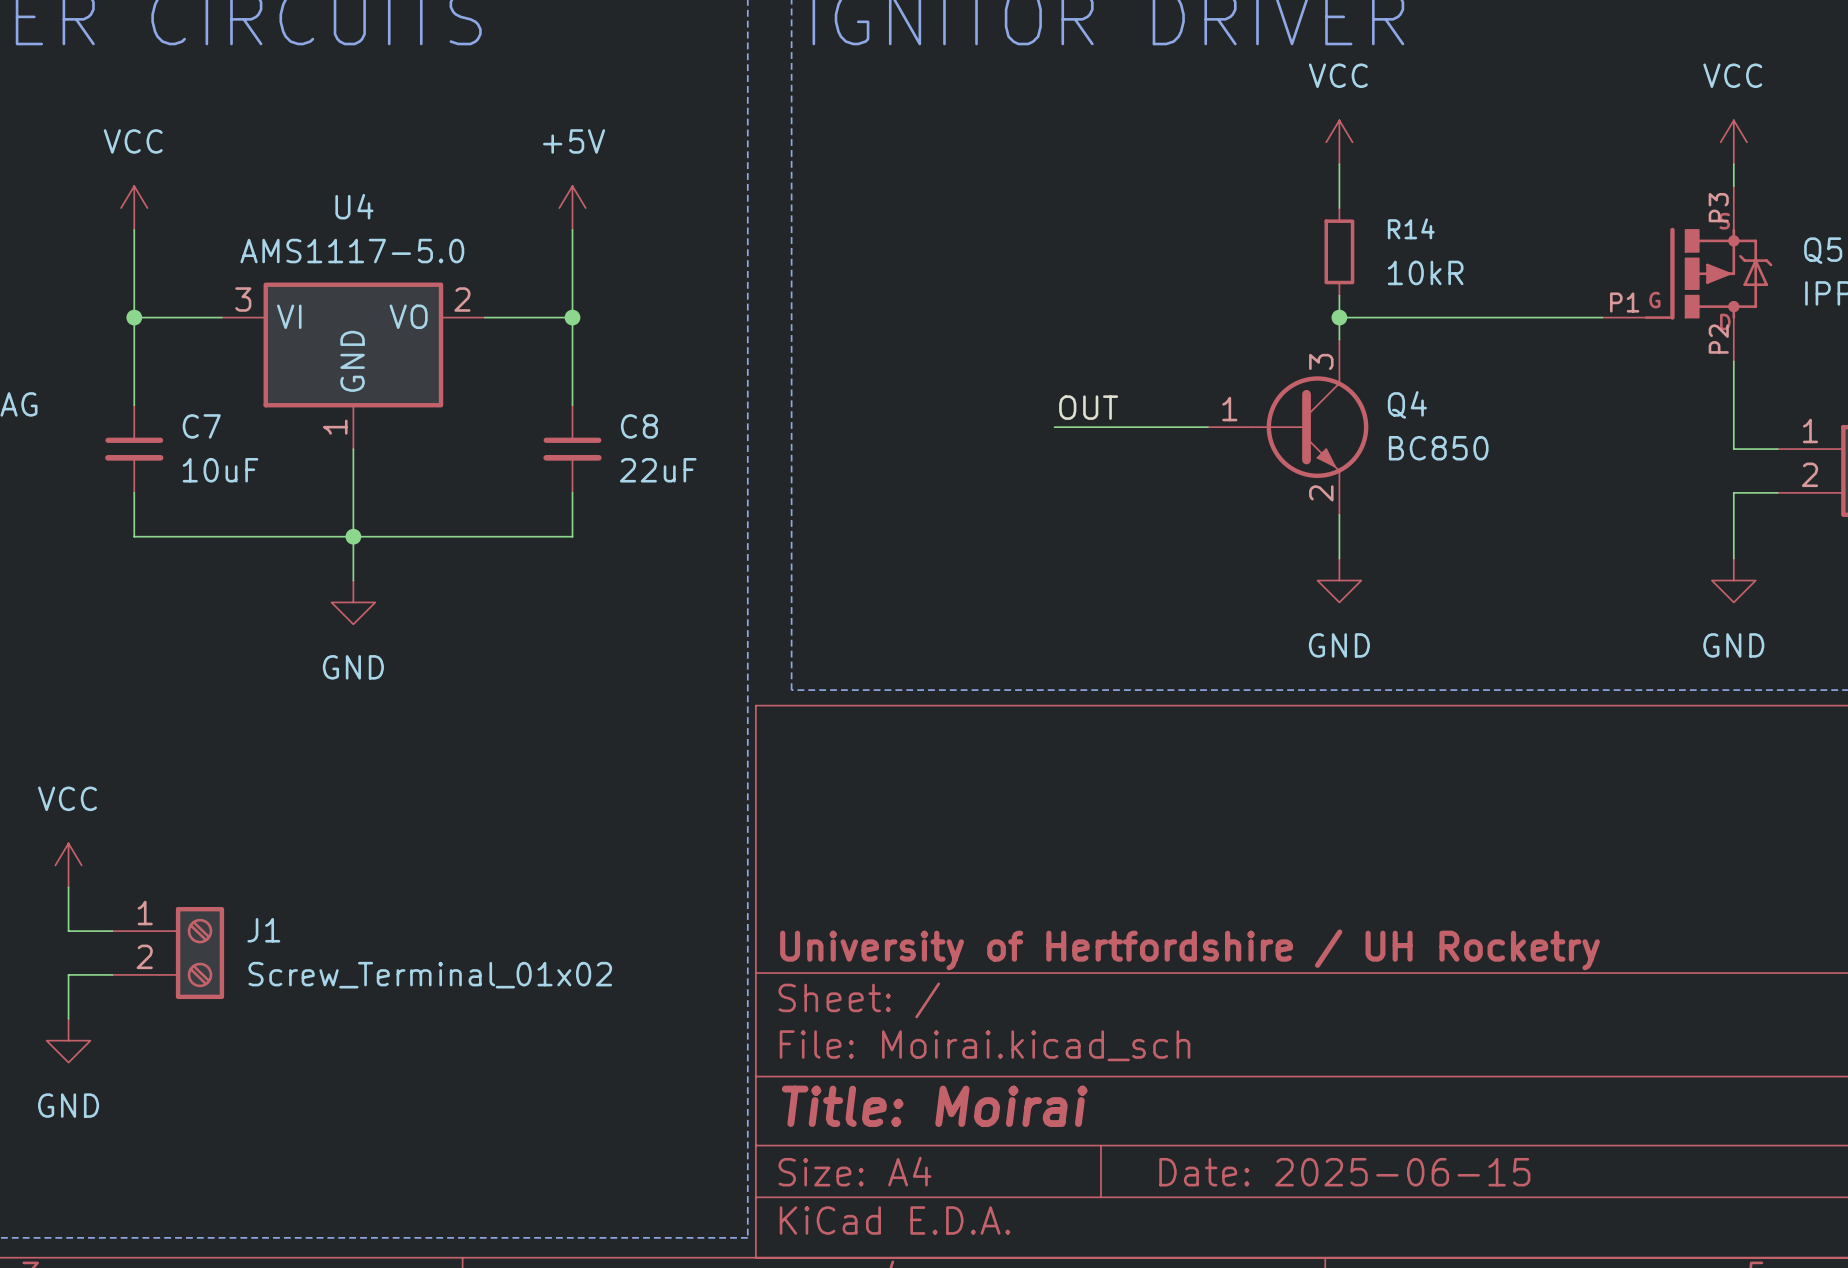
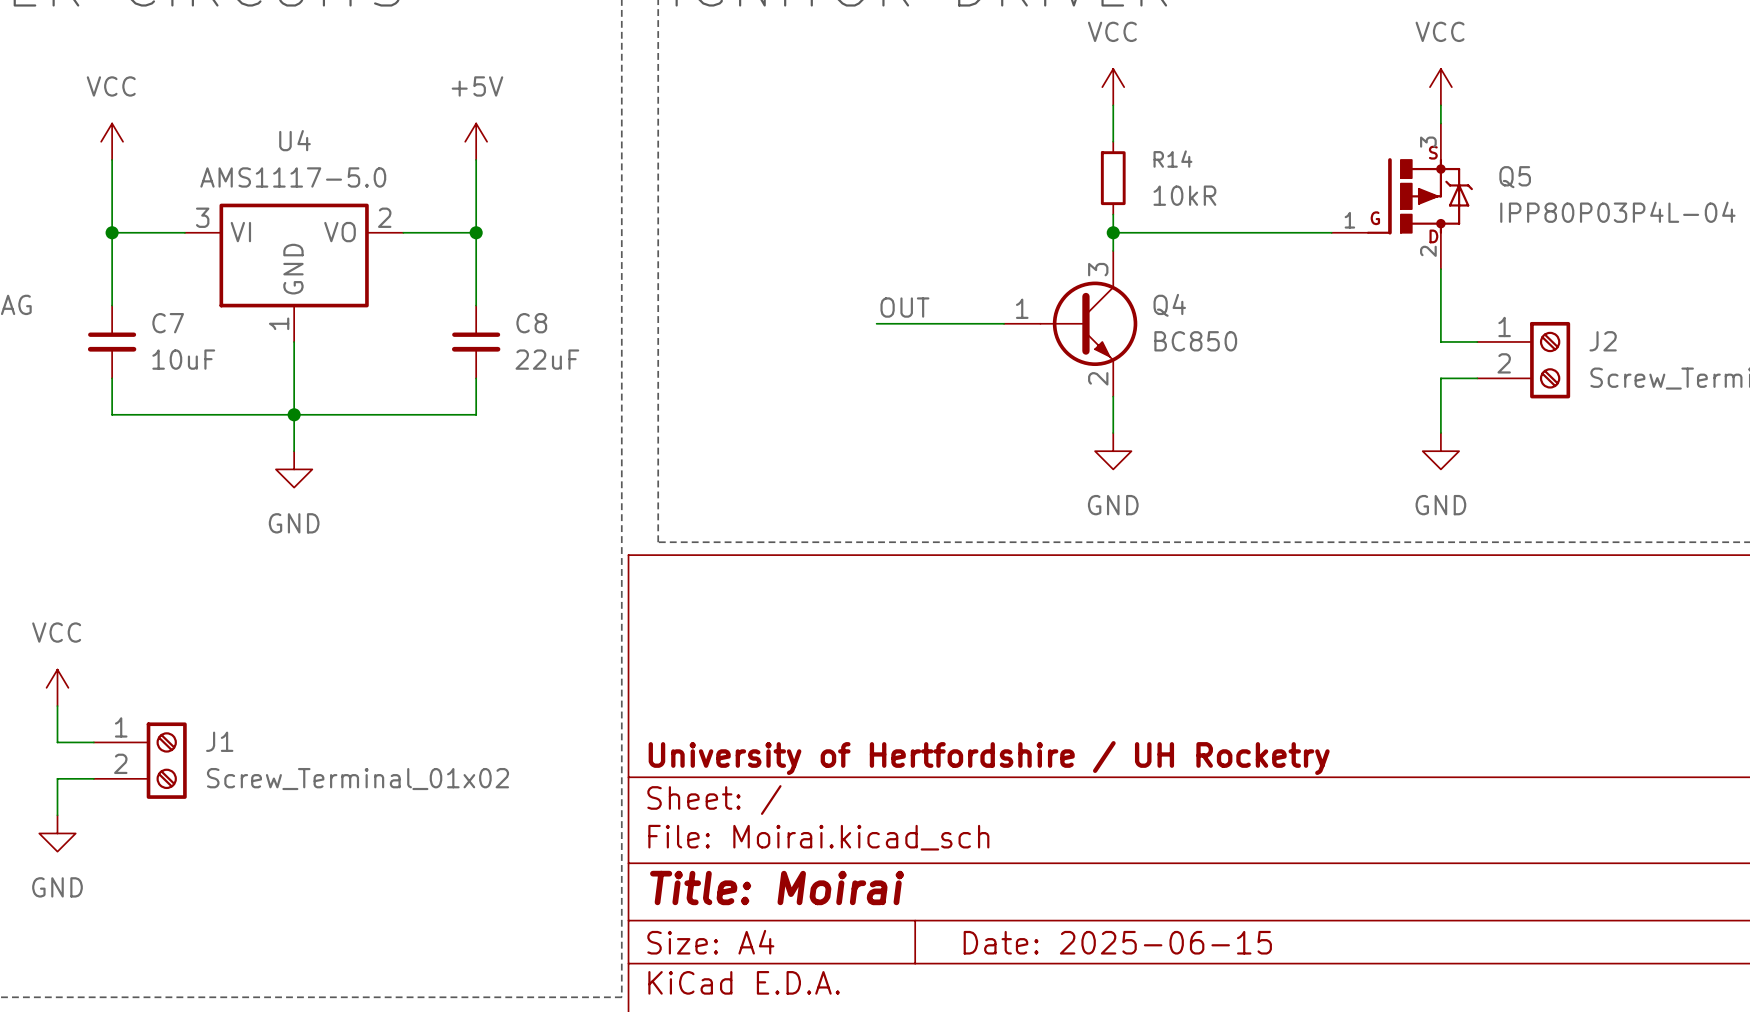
Q5 pin number: P3 (1718, 207) -> 3 (1428, 142)
Q5 pin number: P1 (1624, 302) -> 1 (1349, 220)
Q5 pin number: P2 (1718, 339) -> 2 (1428, 251)

